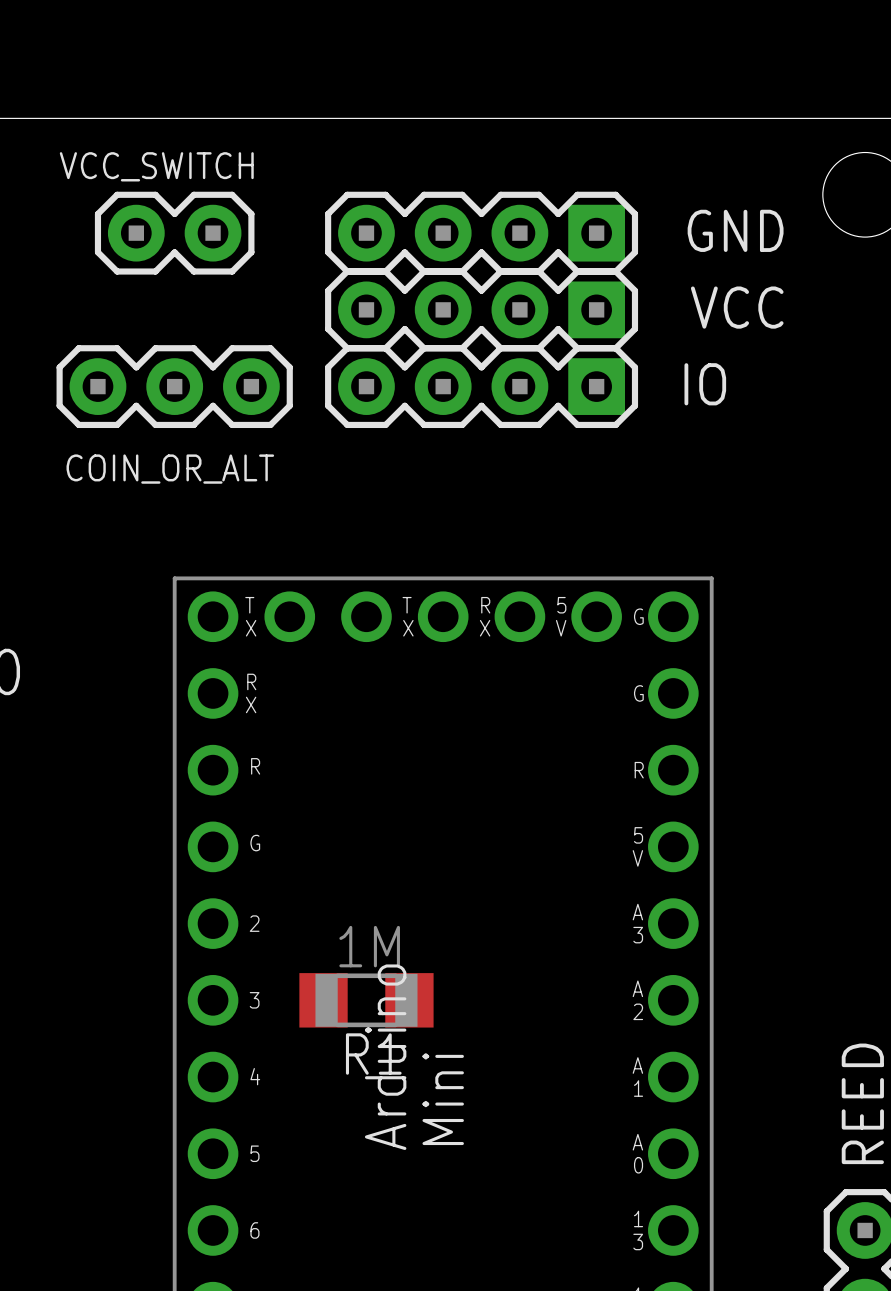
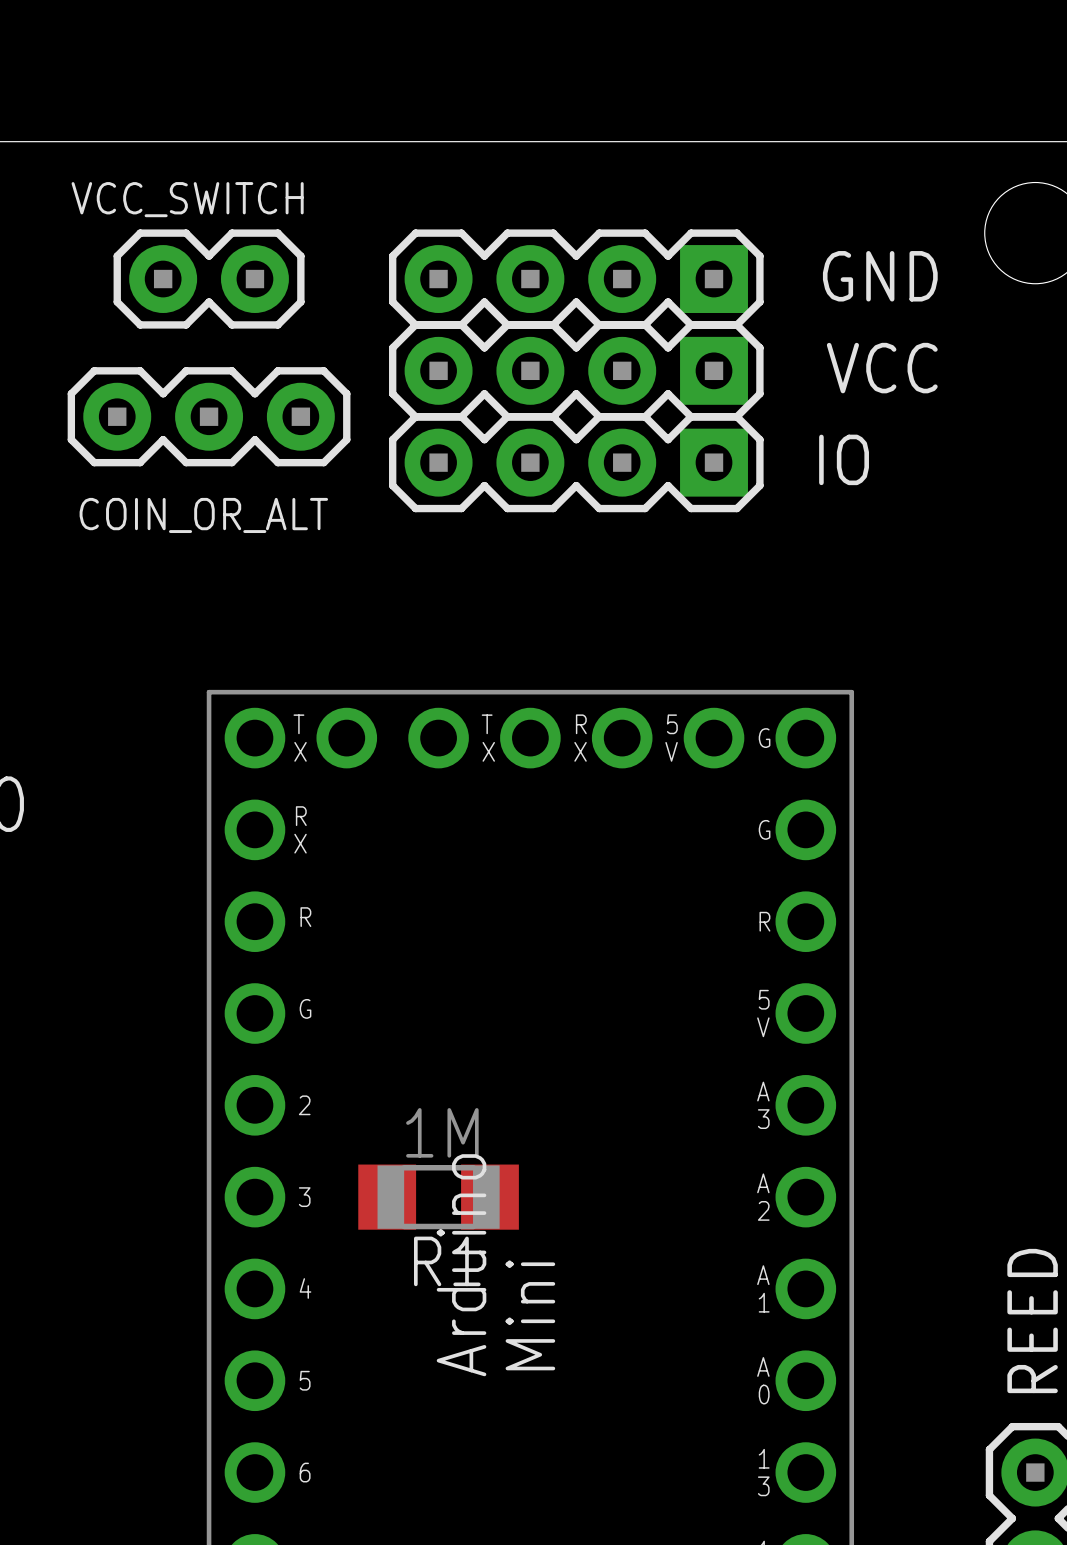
COIN_OR_ALT position: (174, 386) -> (209, 416)

